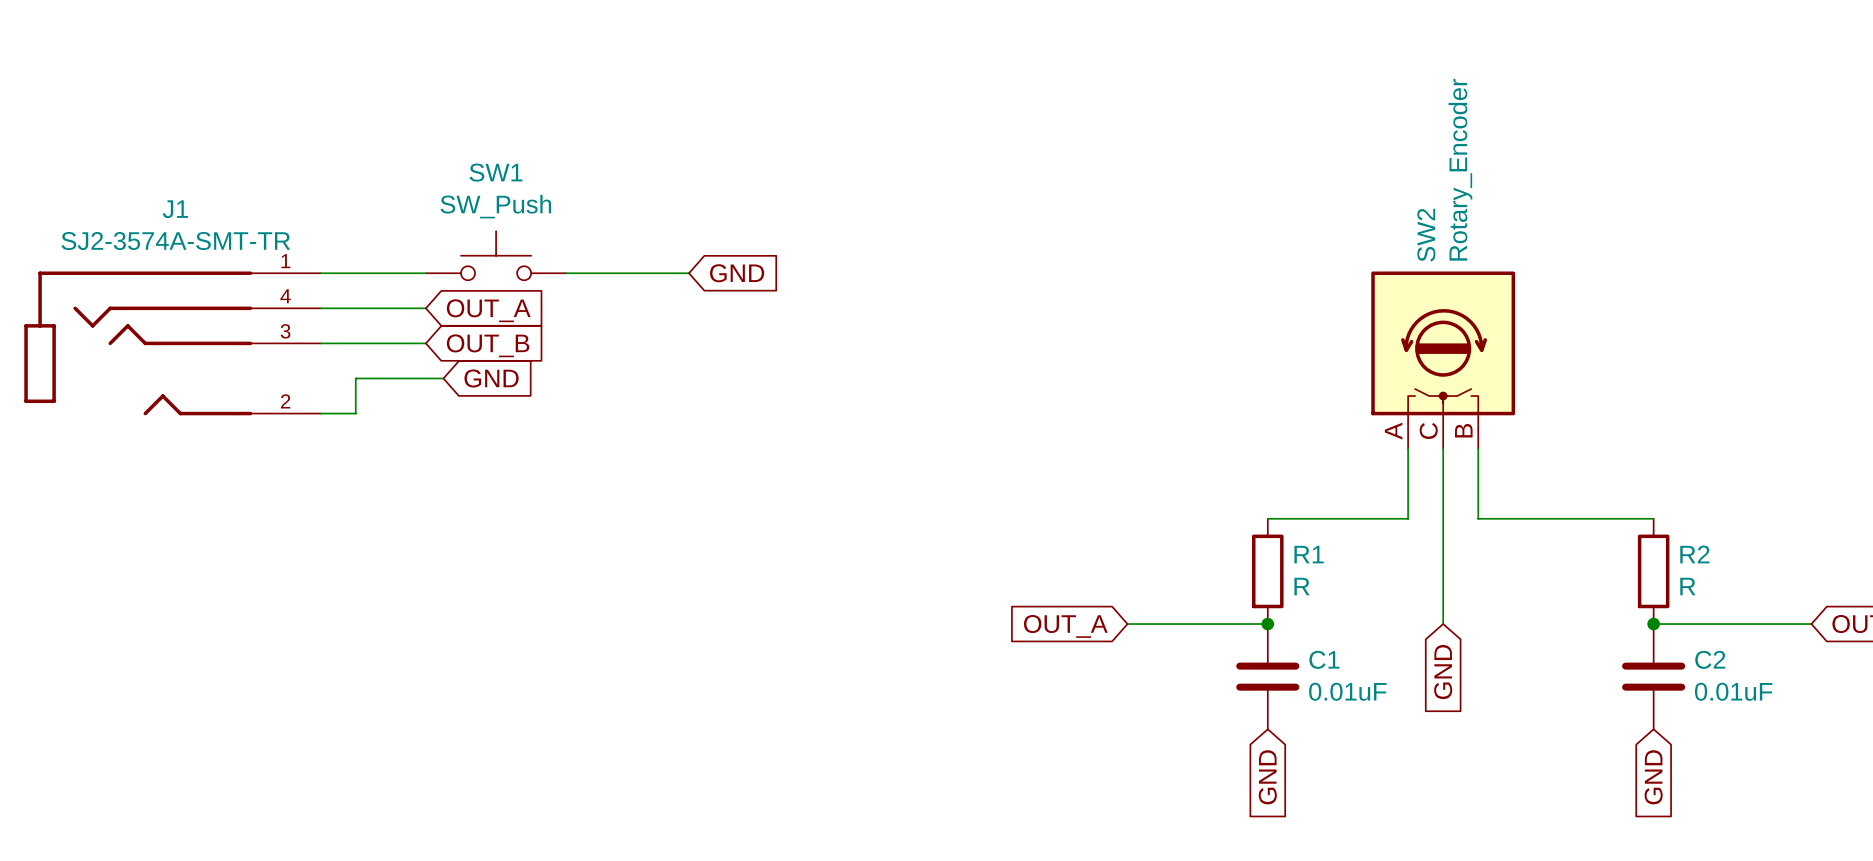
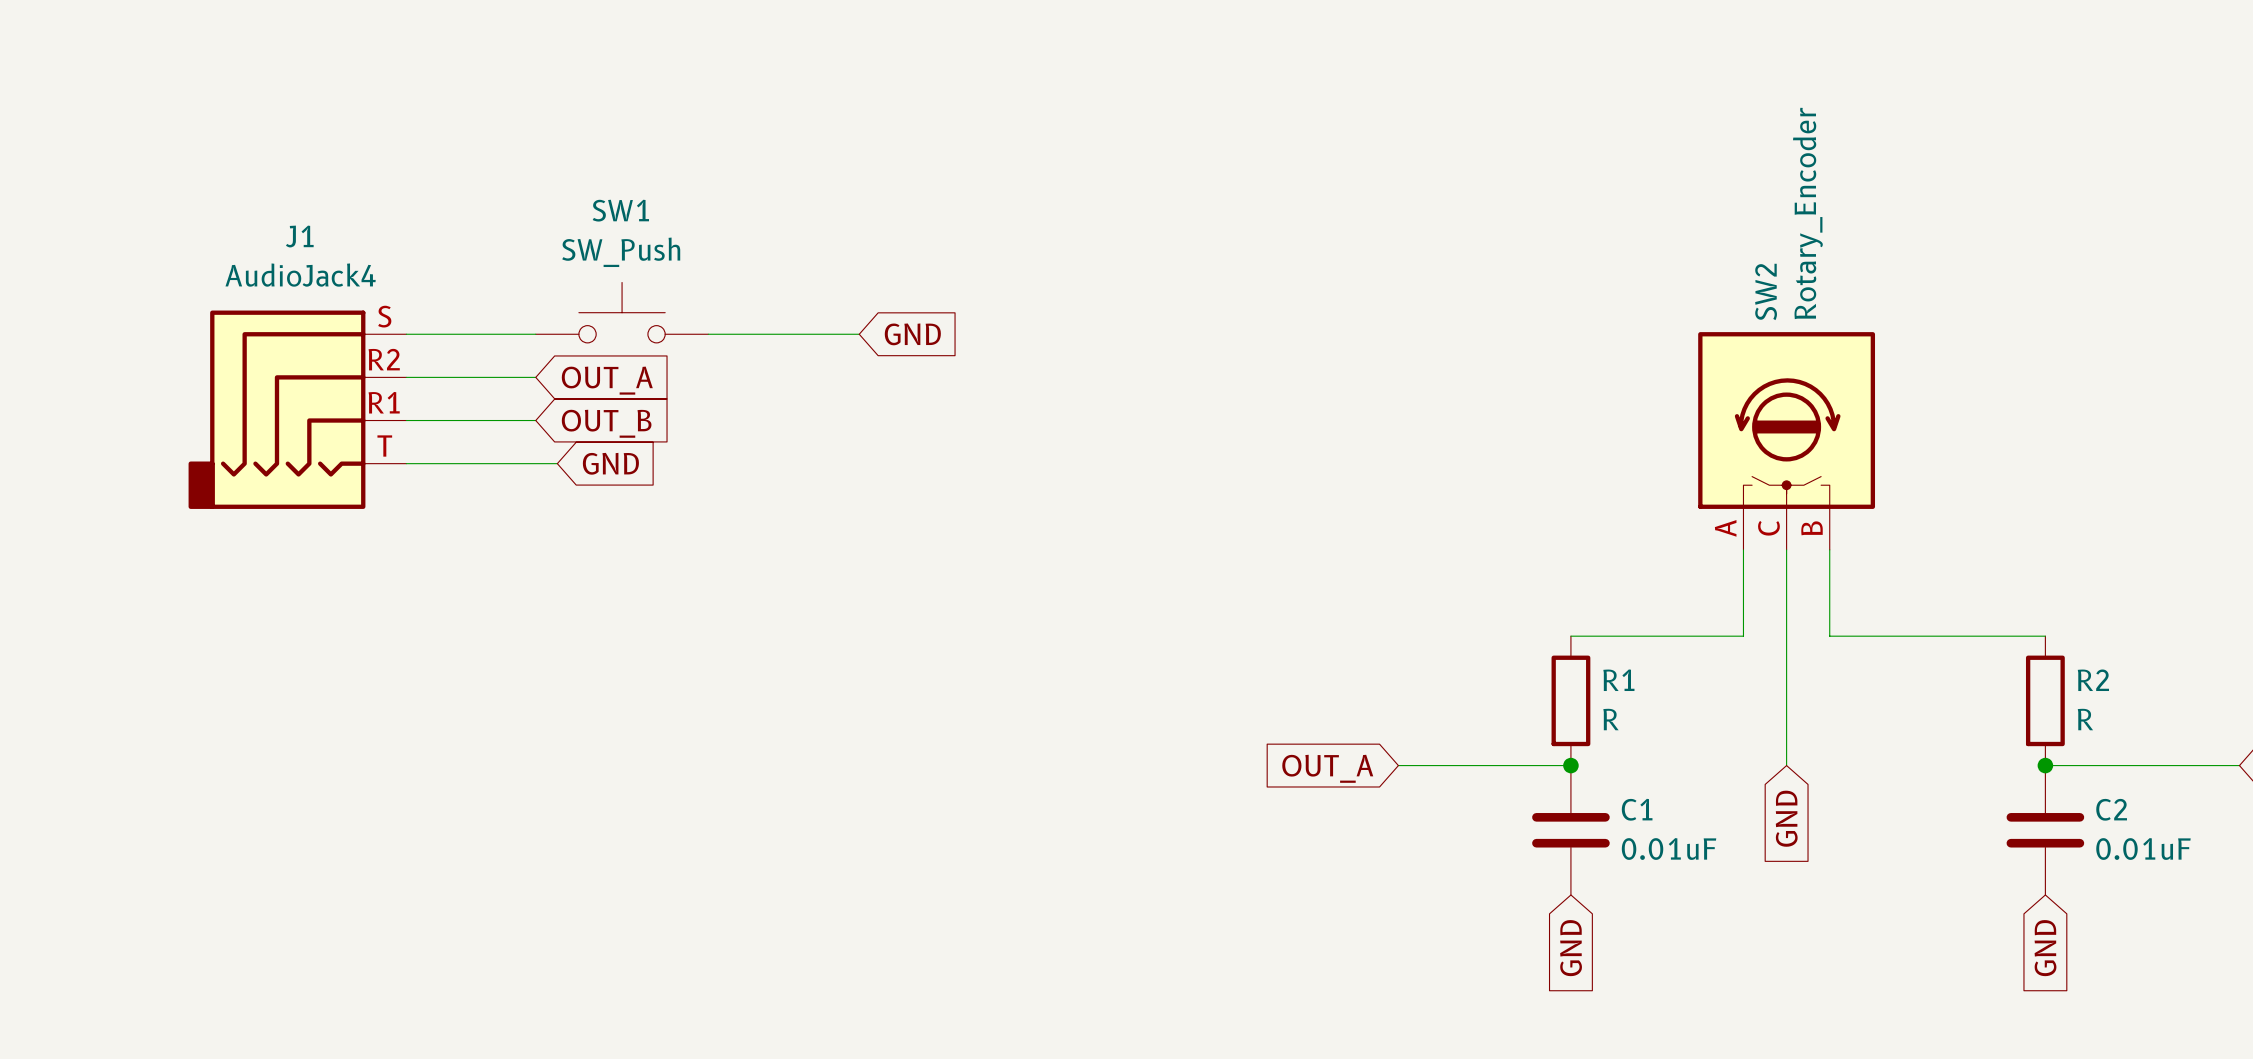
J1 value: SJ2-3574A-SMT-TR (175, 241) -> AudioJack4 (300, 275)
J1 symbol: [24, 271, 321, 416] -> [188, 310, 407, 509]
wire: (355, 378) (355, 413) (320, 413) -> (449, 463) (406, 463)

